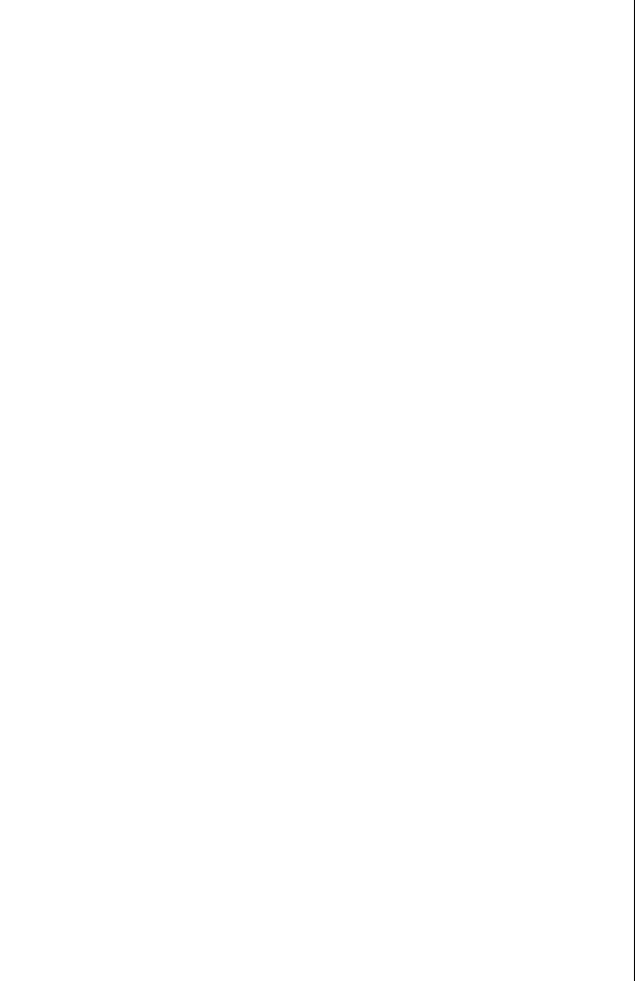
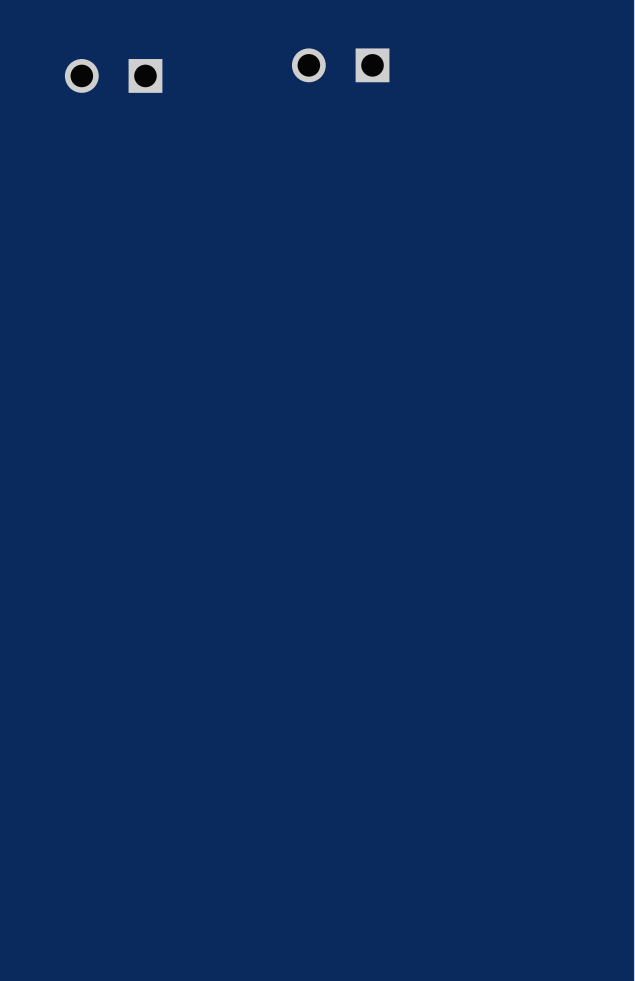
part: none -> (340, 65)
part: none -> (113, 75)

